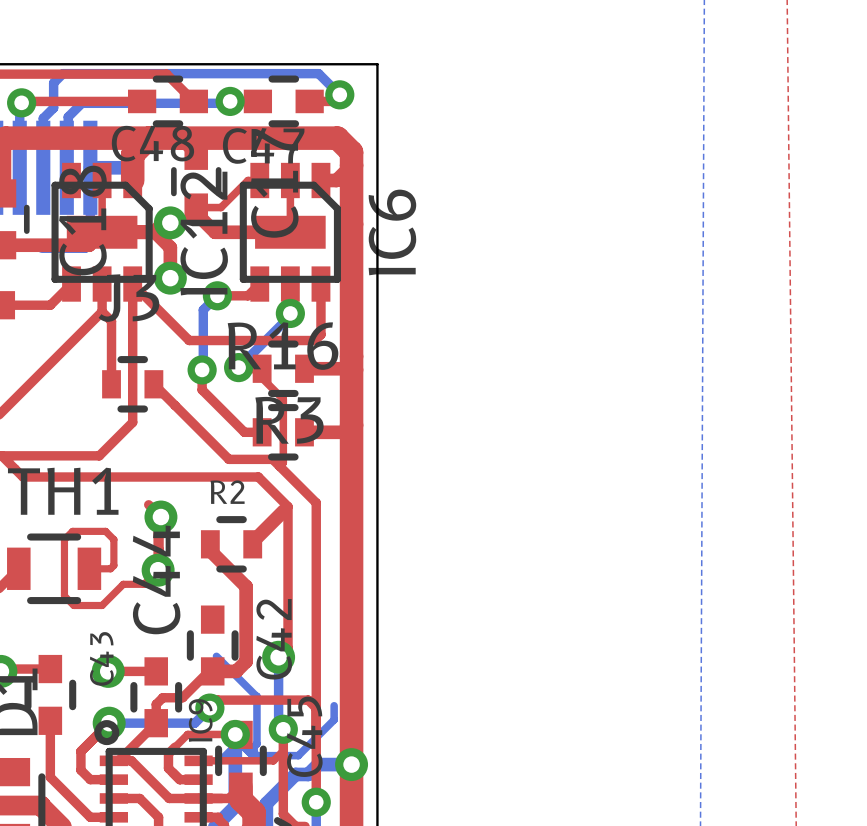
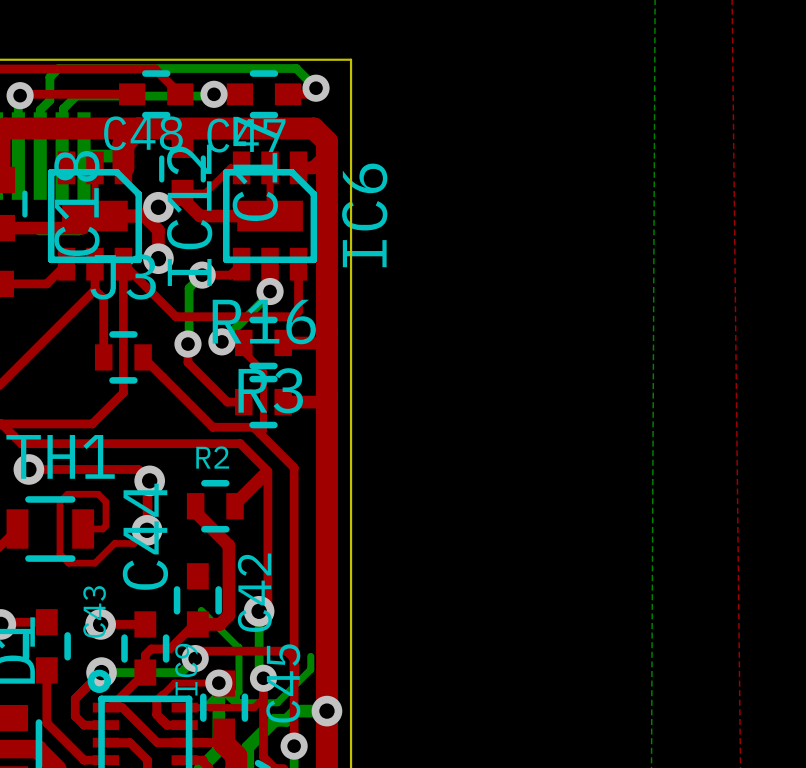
top track: none -> (28, 469) (138, 469)
via: none -> (28, 469)

